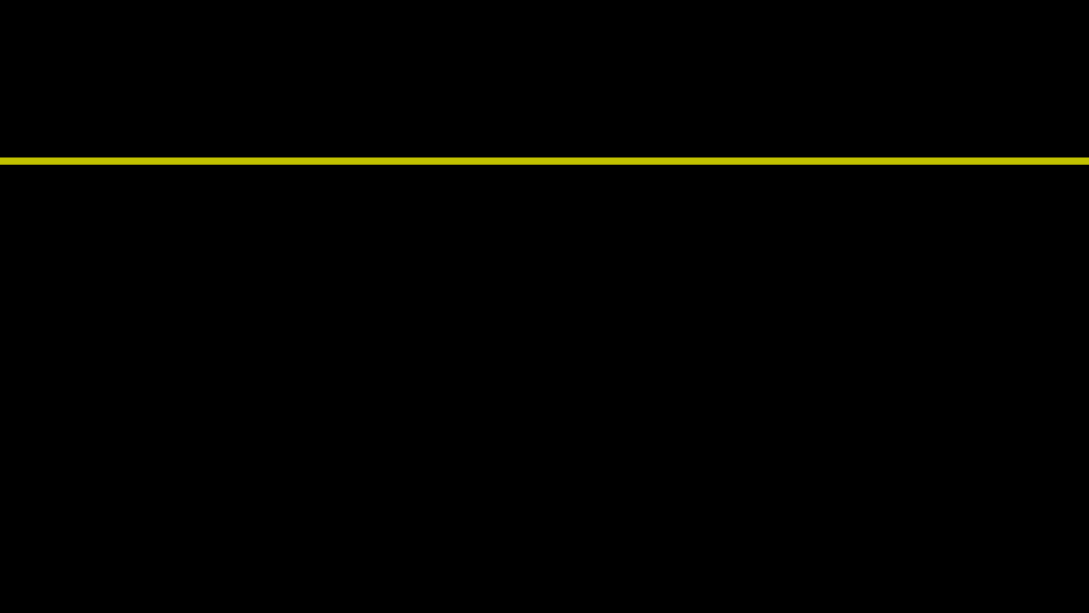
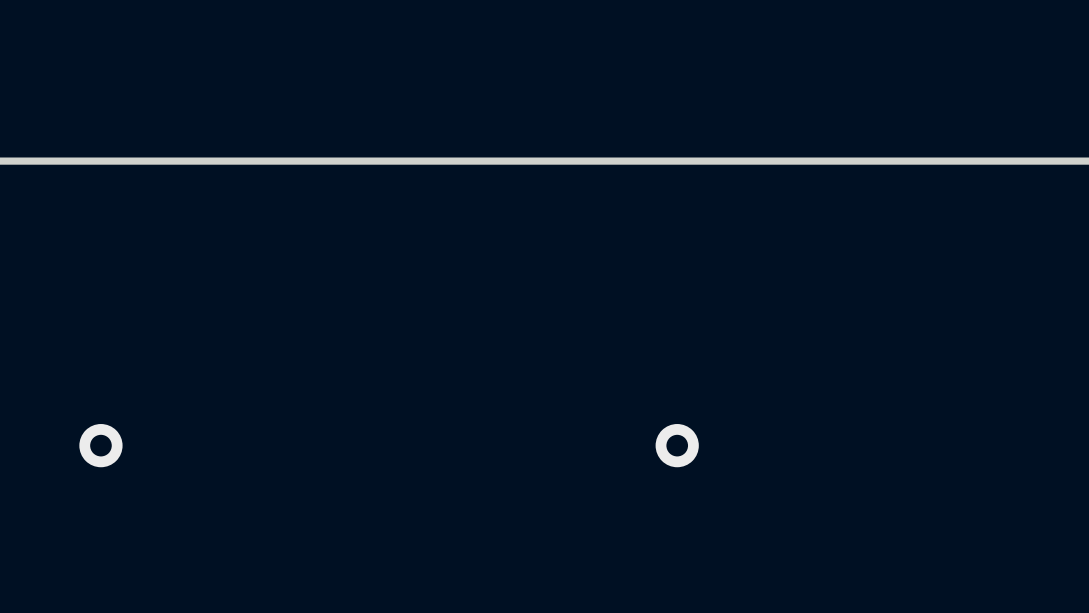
via: none -> (100, 445)
via: none -> (677, 445)

